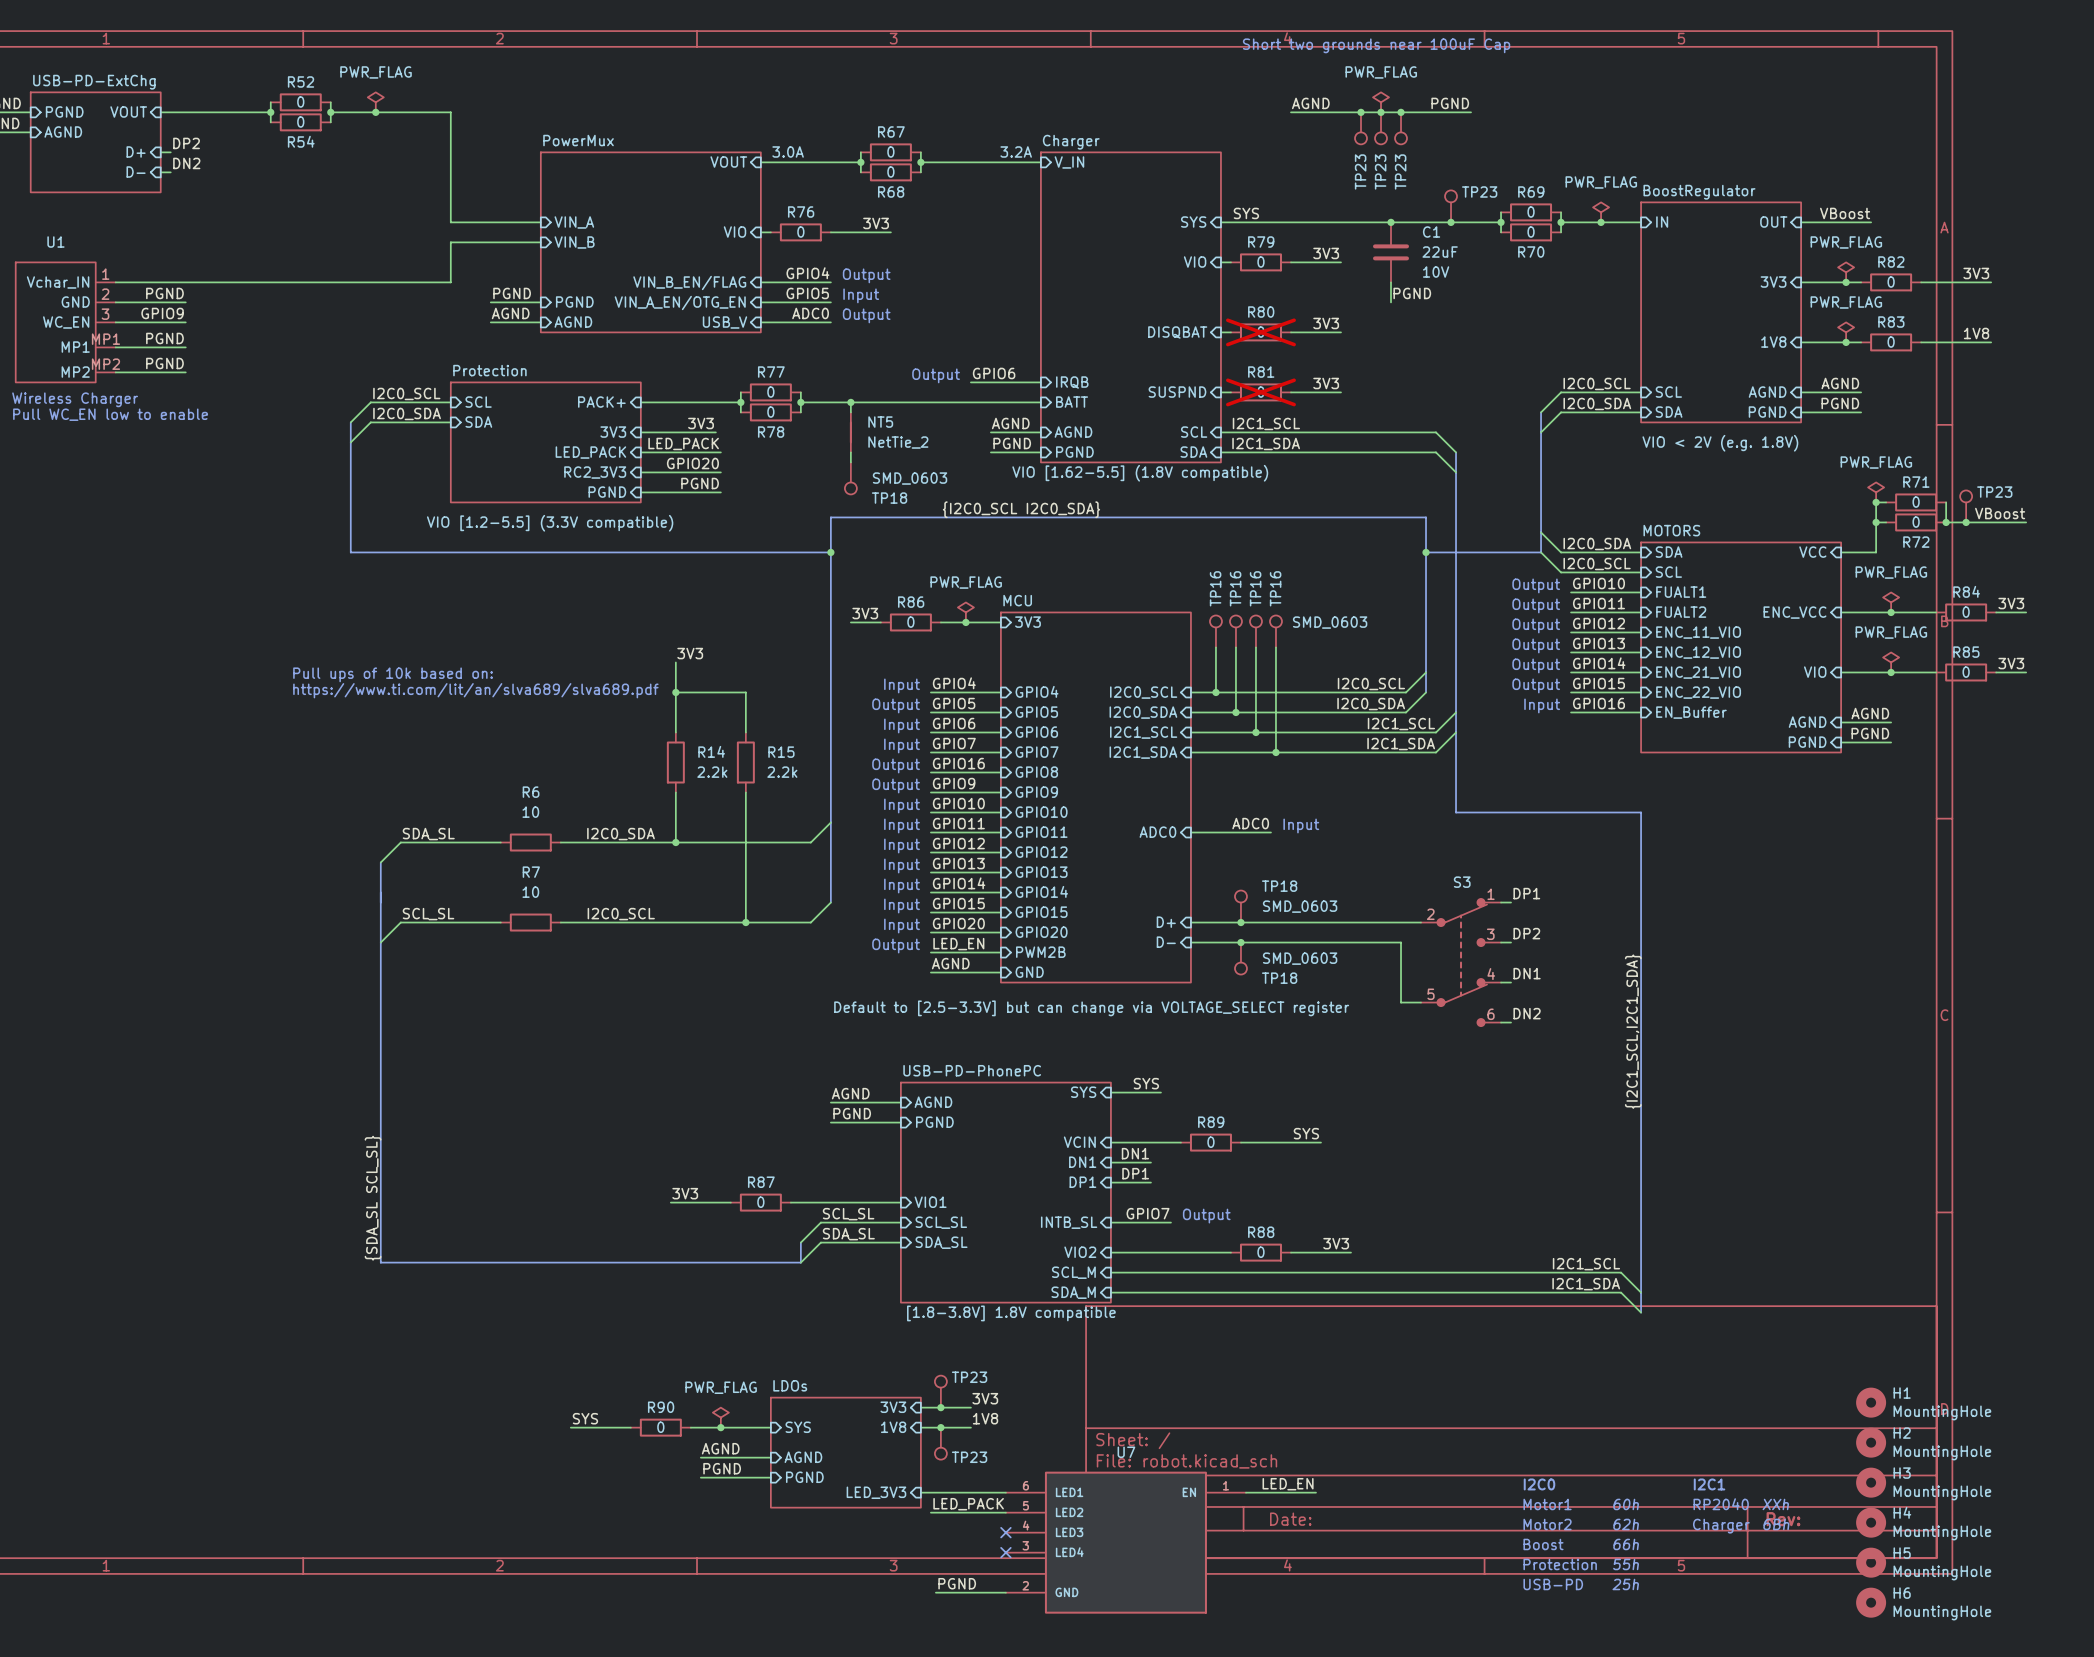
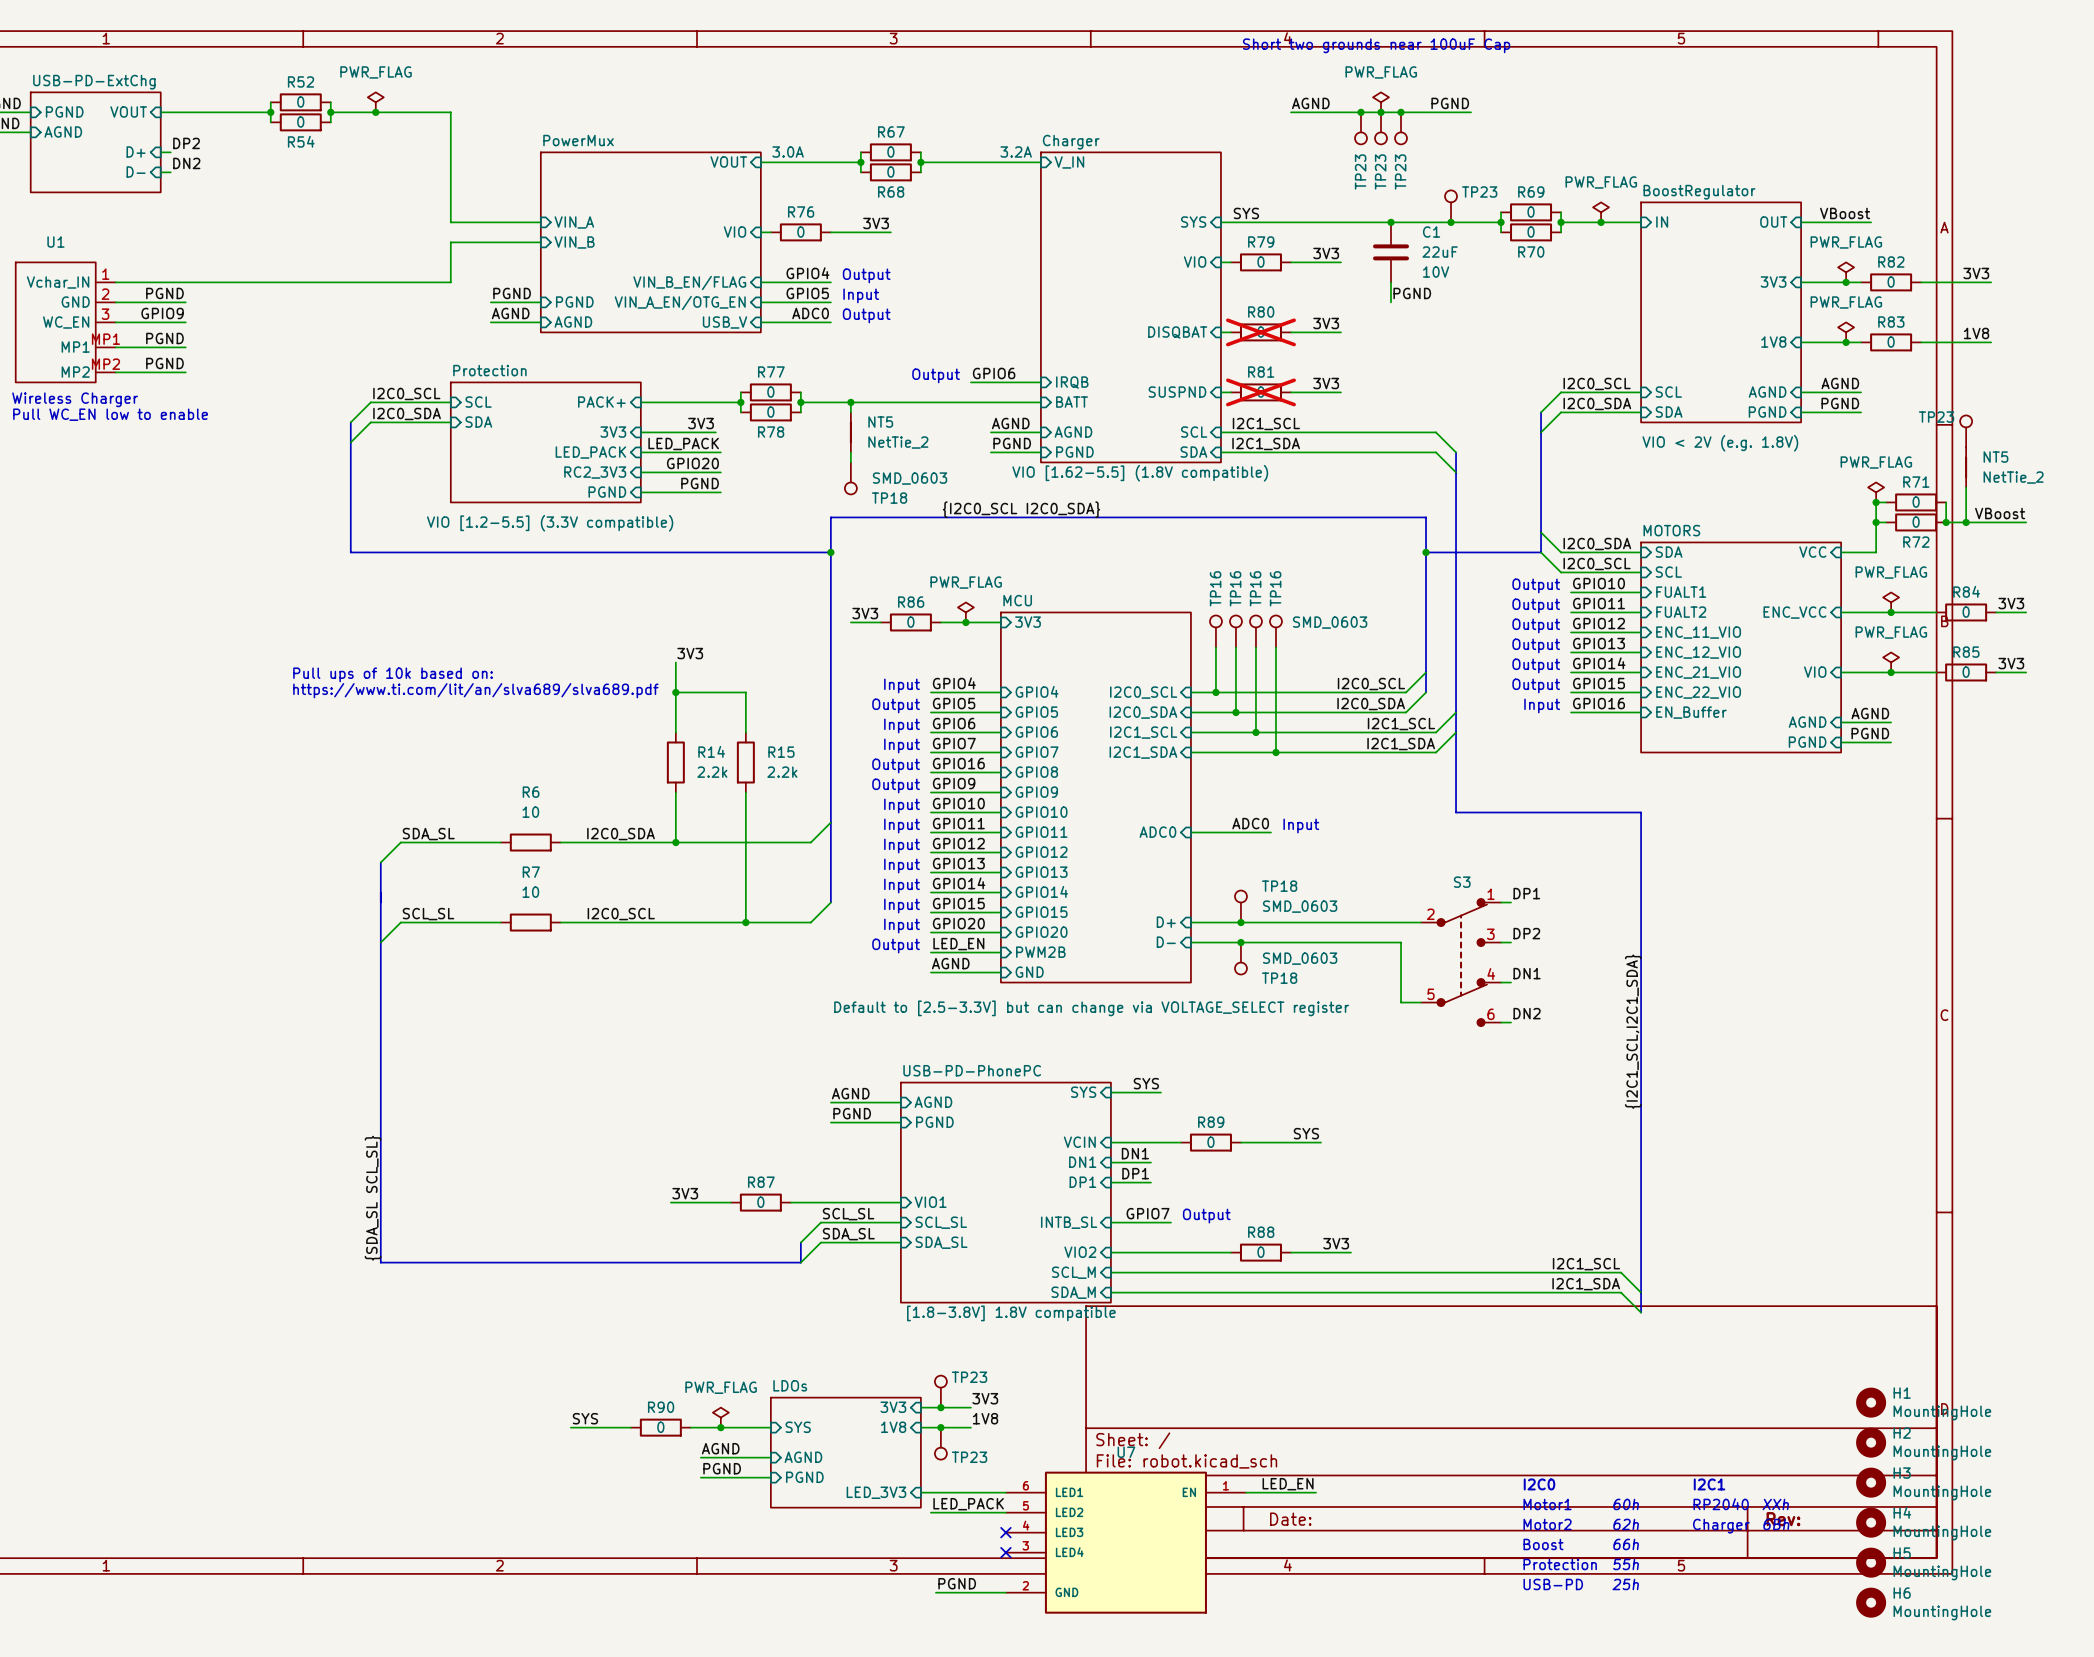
NT5: none -> NetTie_2 (1966, 467)
TP23 name position: TP23 (1994, 492) -> TP23 (1936, 417)
TP23 position: (1966, 506) -> (1966, 431)

